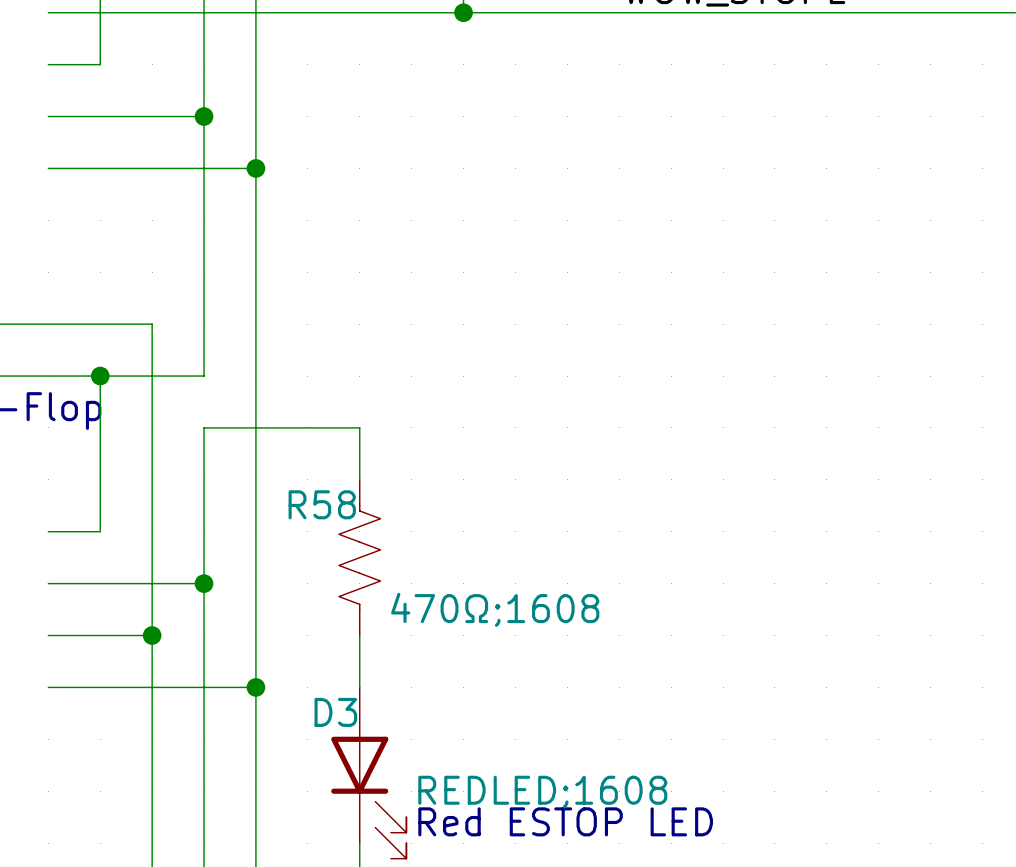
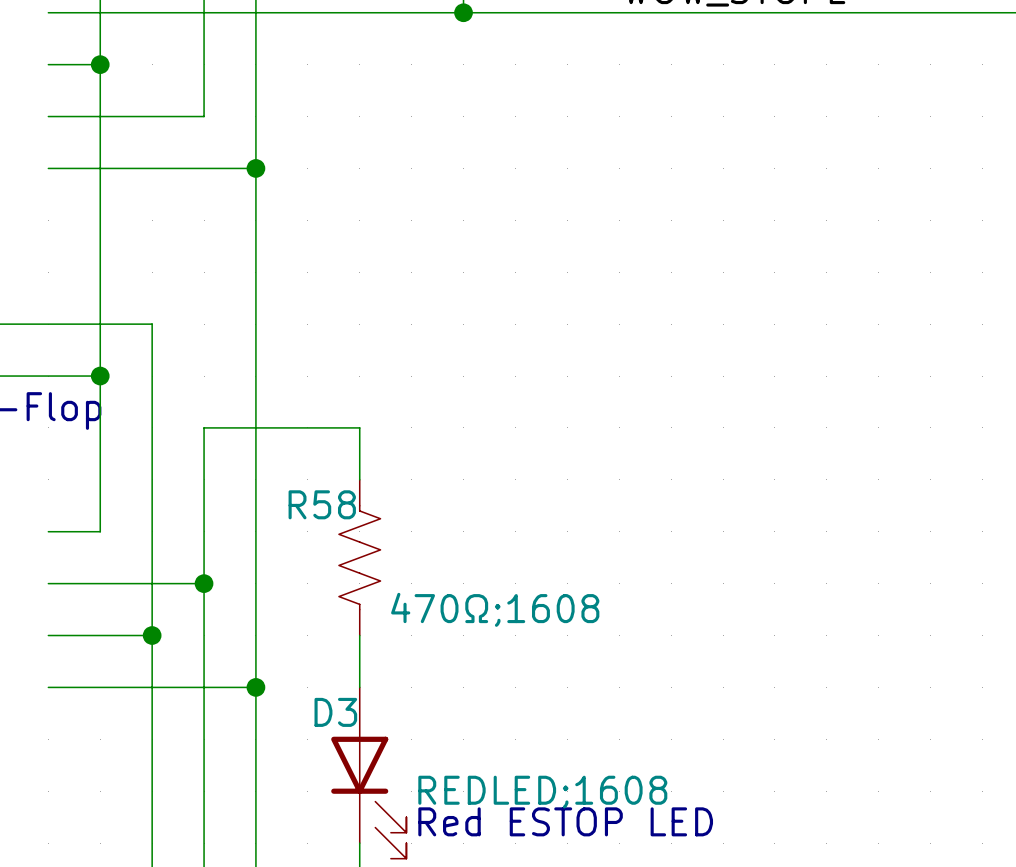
wire: (204, 116) (204, 376) (100, 376) -> (100, 64) (100, 376)
junction position: (204, 116) -> (100, 64)

